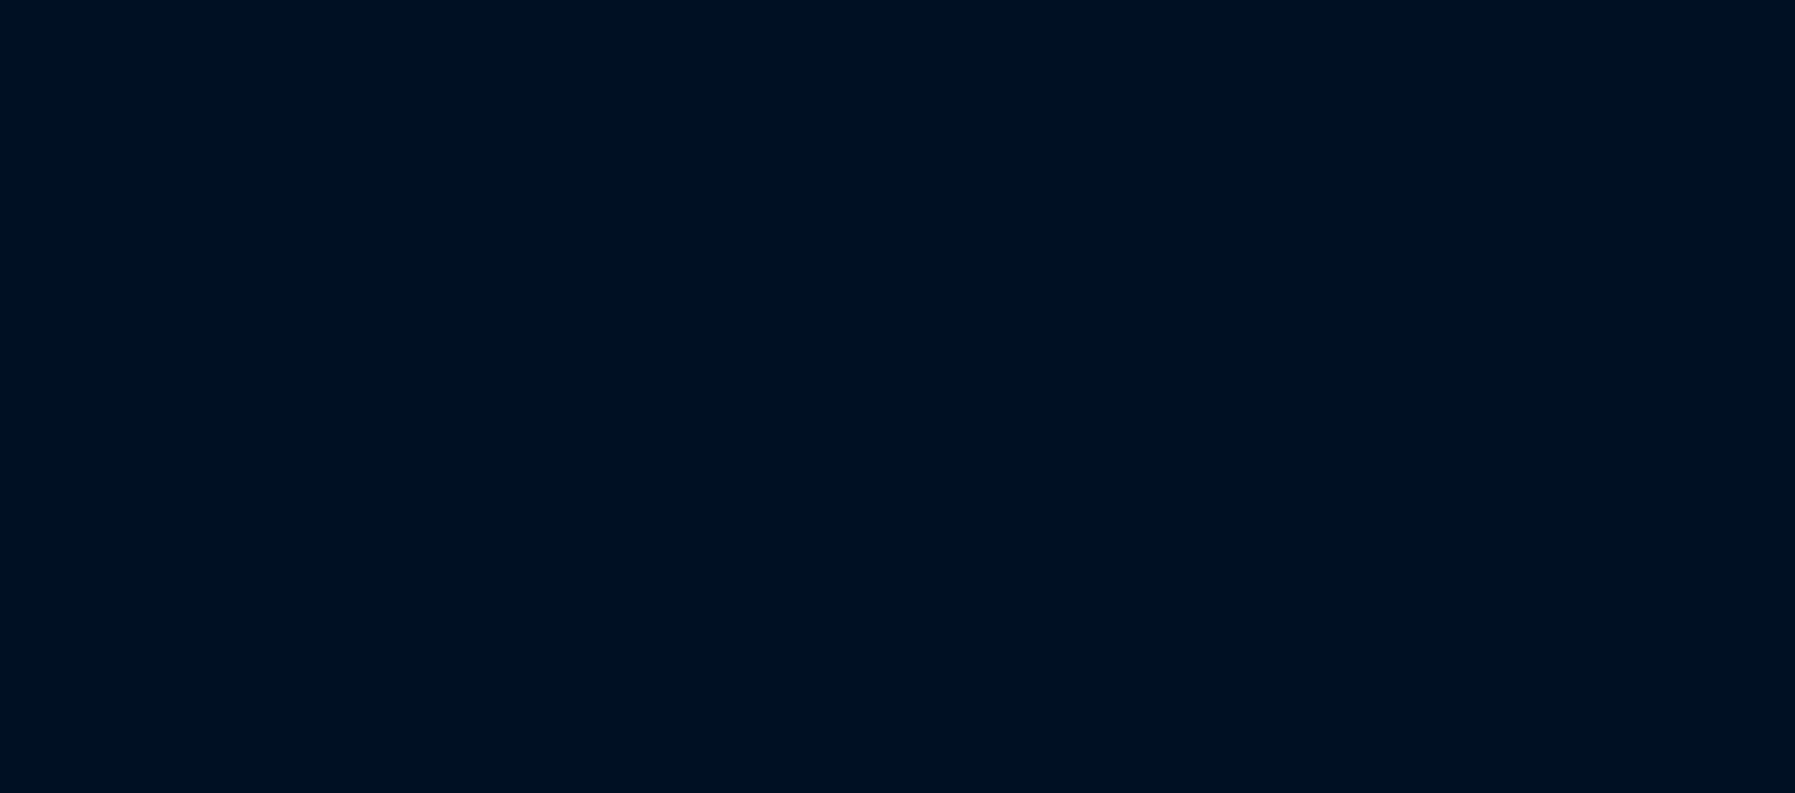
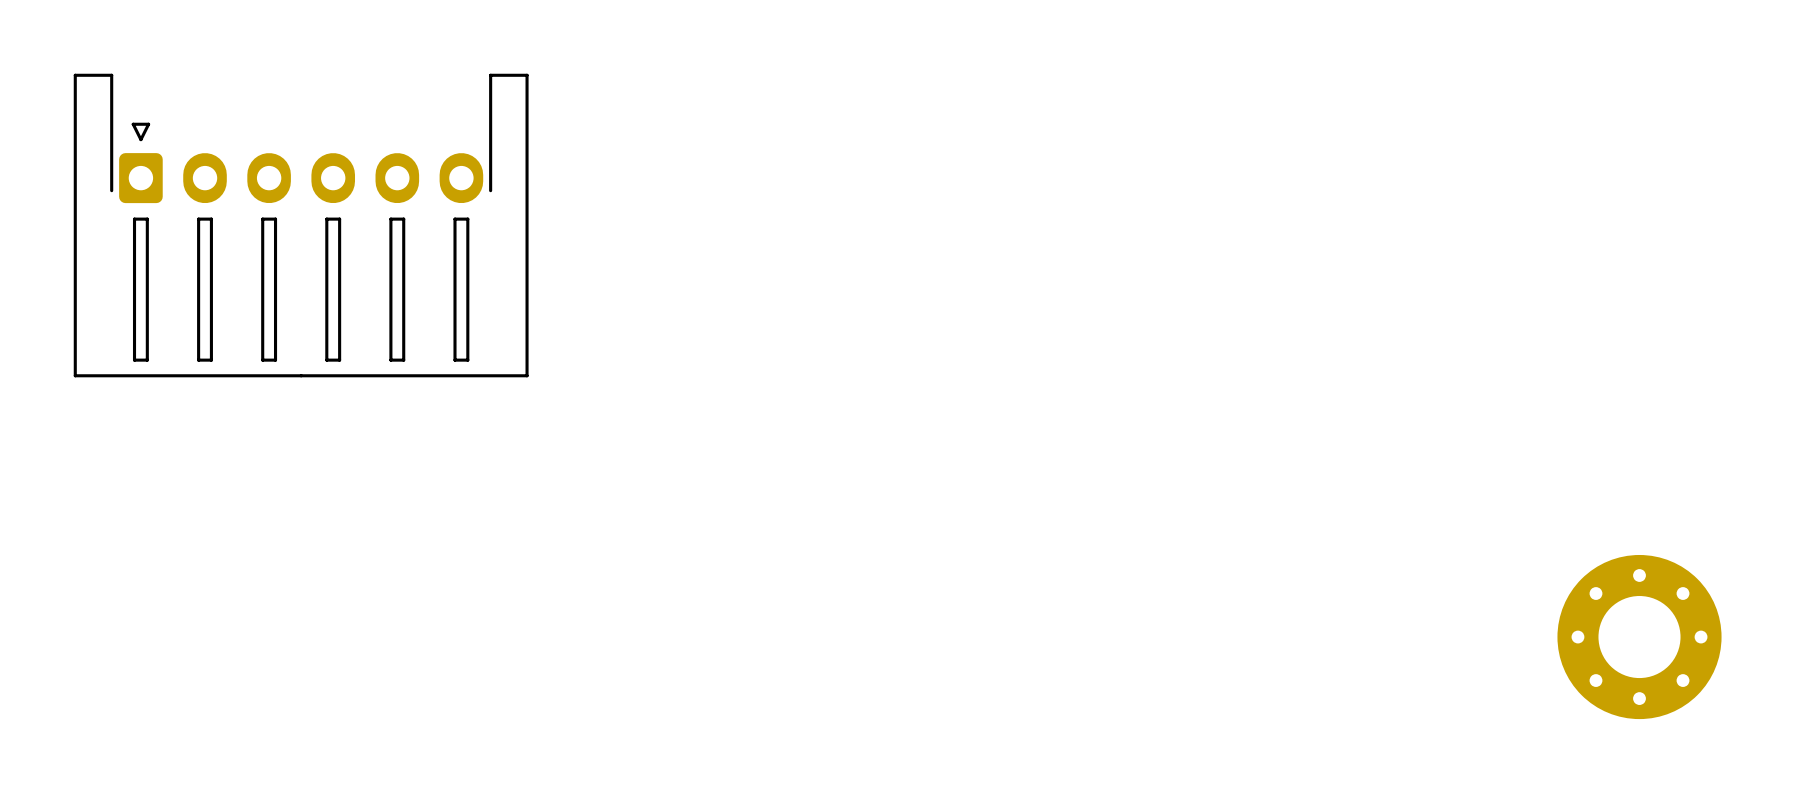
part: none -> (301, 225)
part: none -> (1639, 637)

